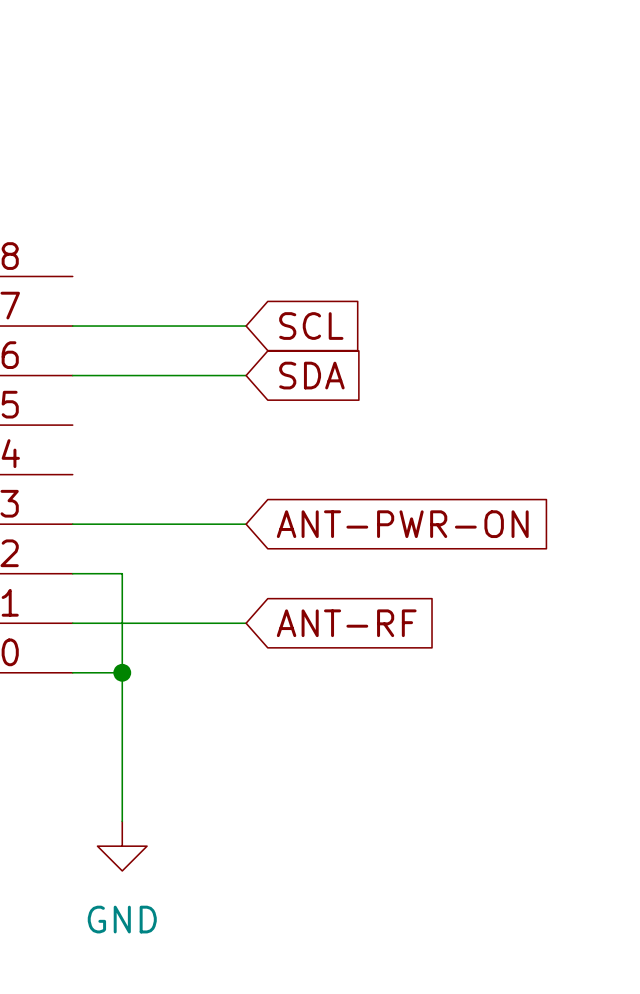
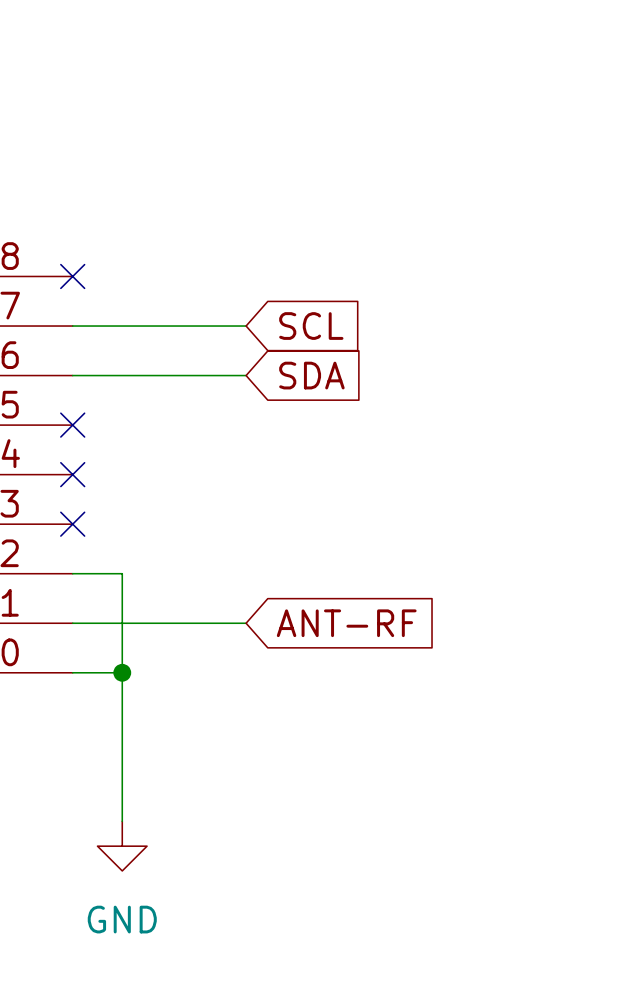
no-connect mark: none -> (72, 276)
no-connect mark: none -> (72, 425)
no-connect mark: none -> (72, 474)
wire: (72, 524) (246, 524) -> none
no-connect mark: none -> (72, 524)
global label: ANT-PWR-ON (402, 524) -> none

